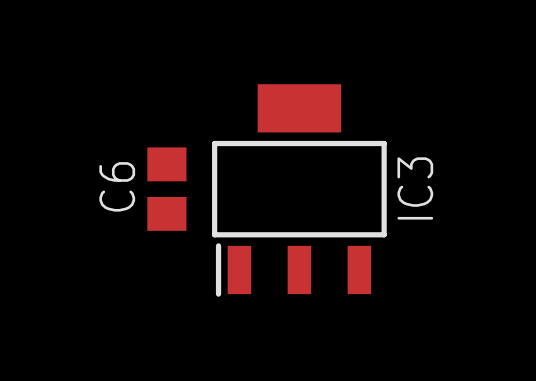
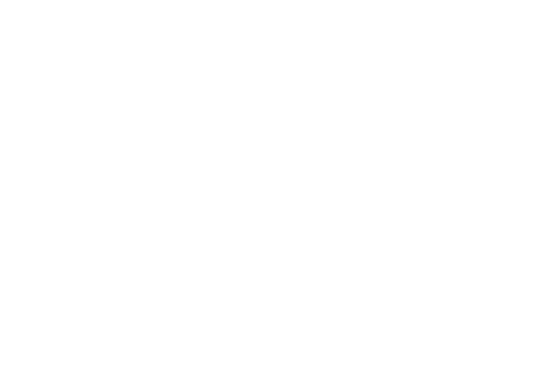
C6: (166, 189) -> none
IC3: (299, 190) -> none

